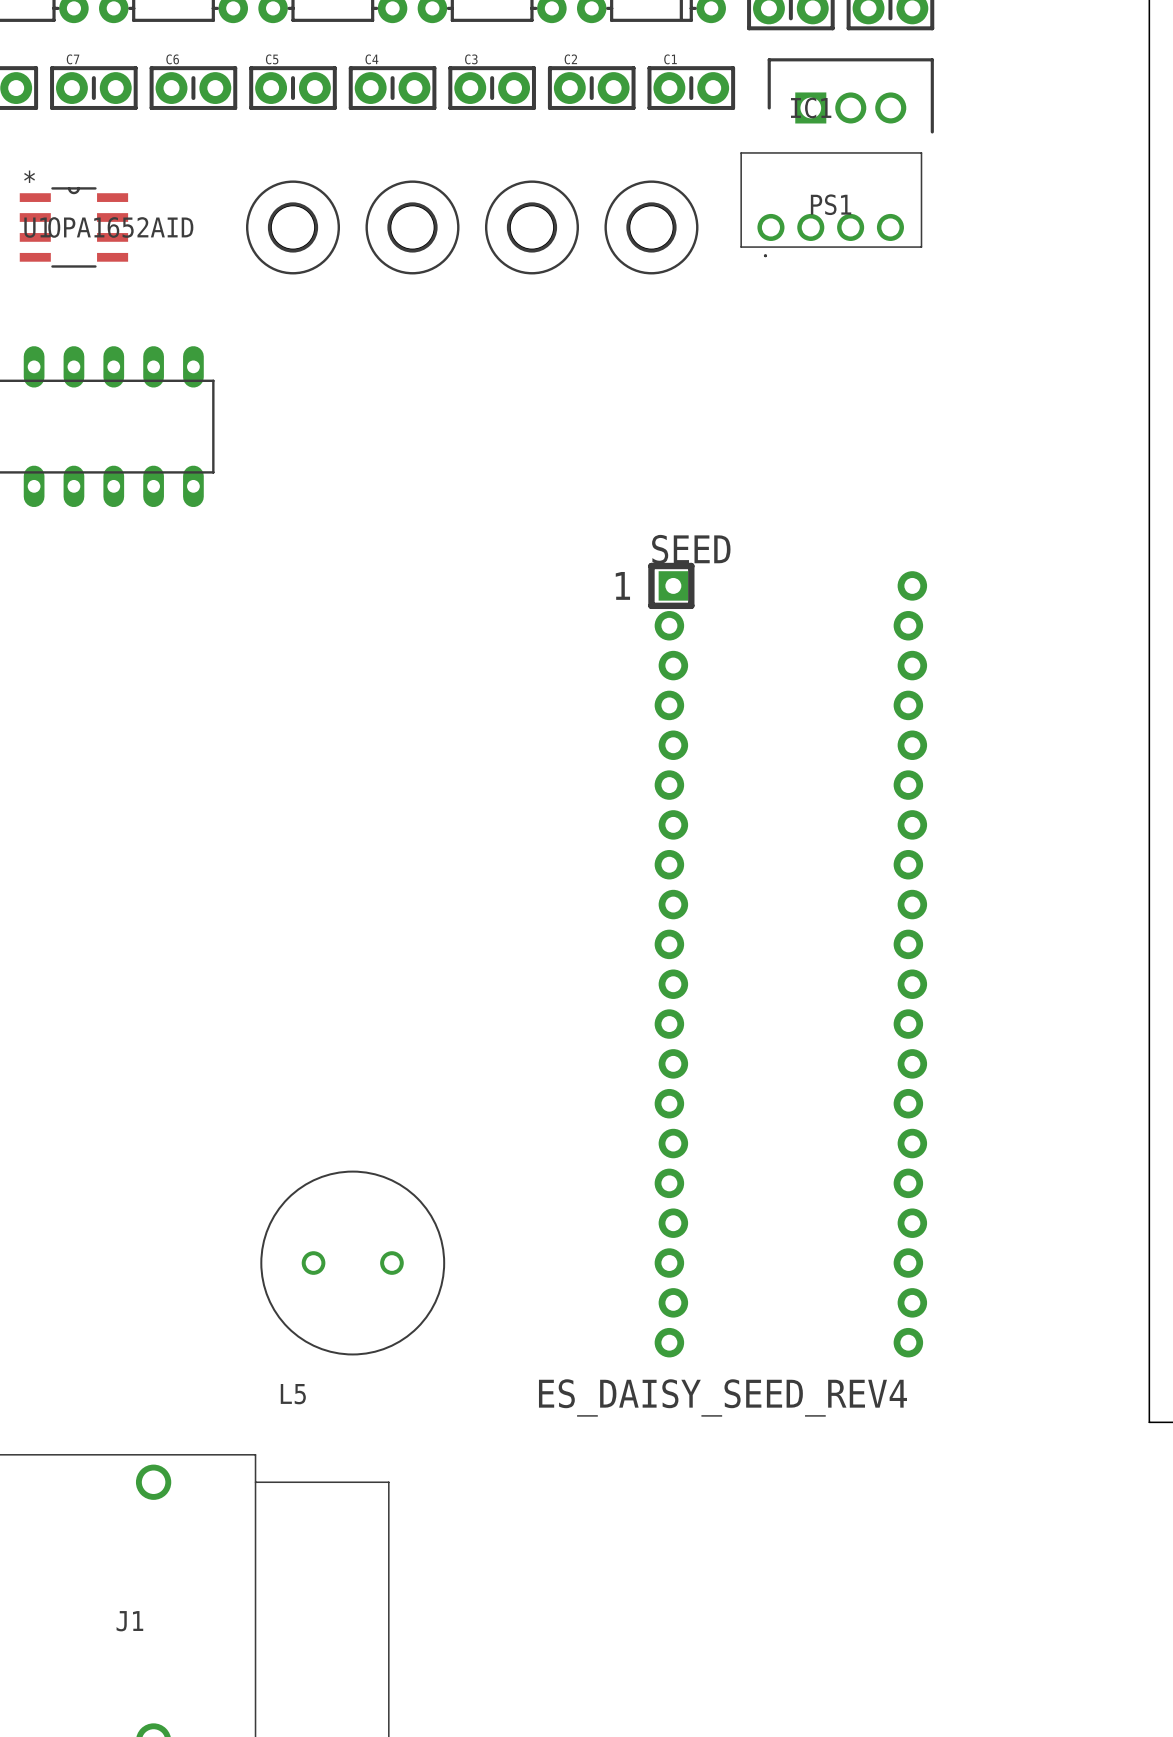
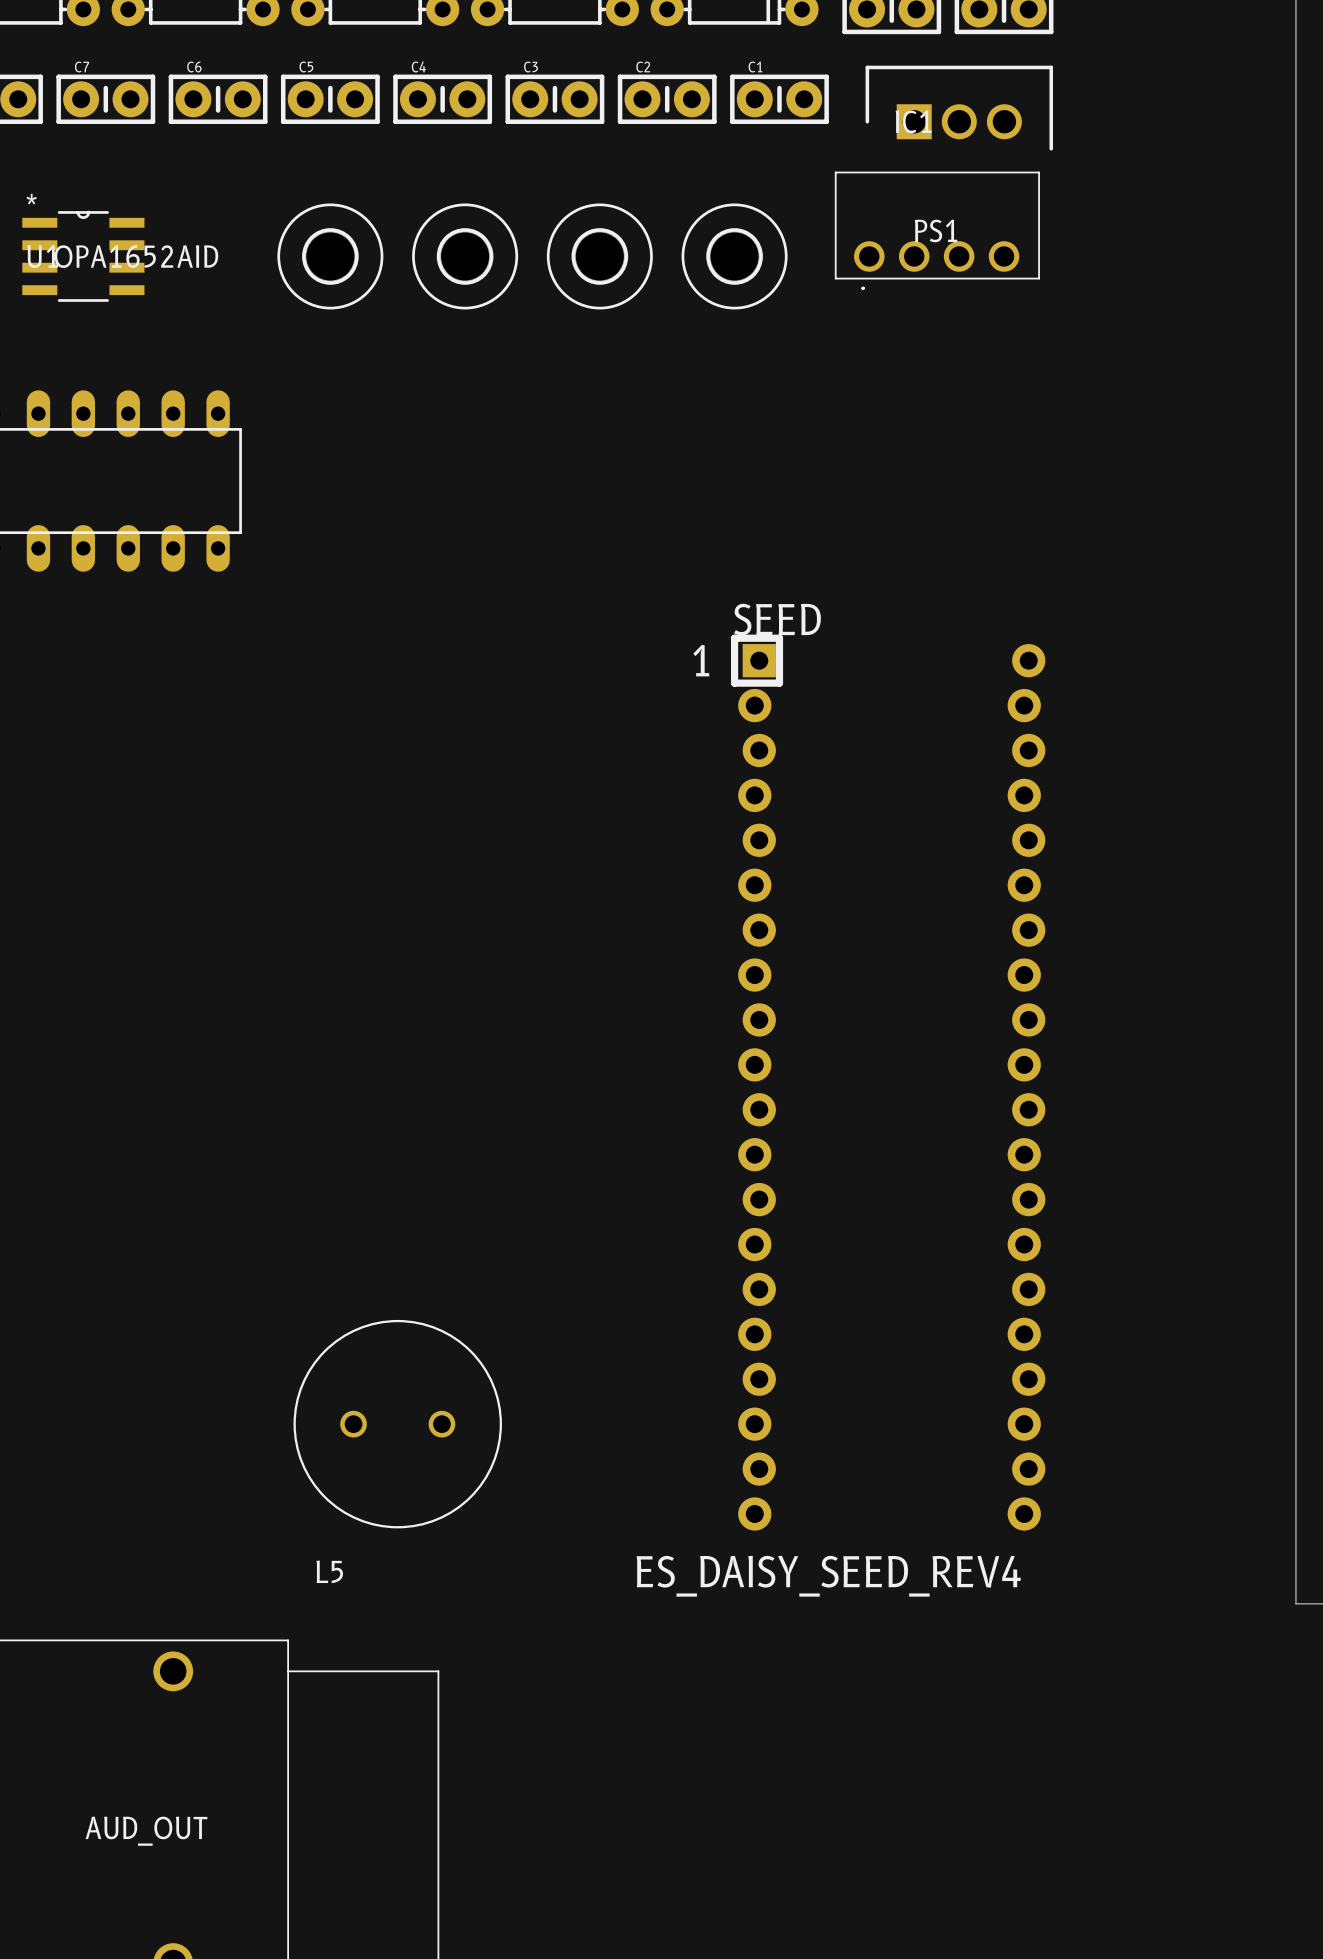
J1 name: J1 (129, 1621) -> AUD_OUT (146, 1831)

